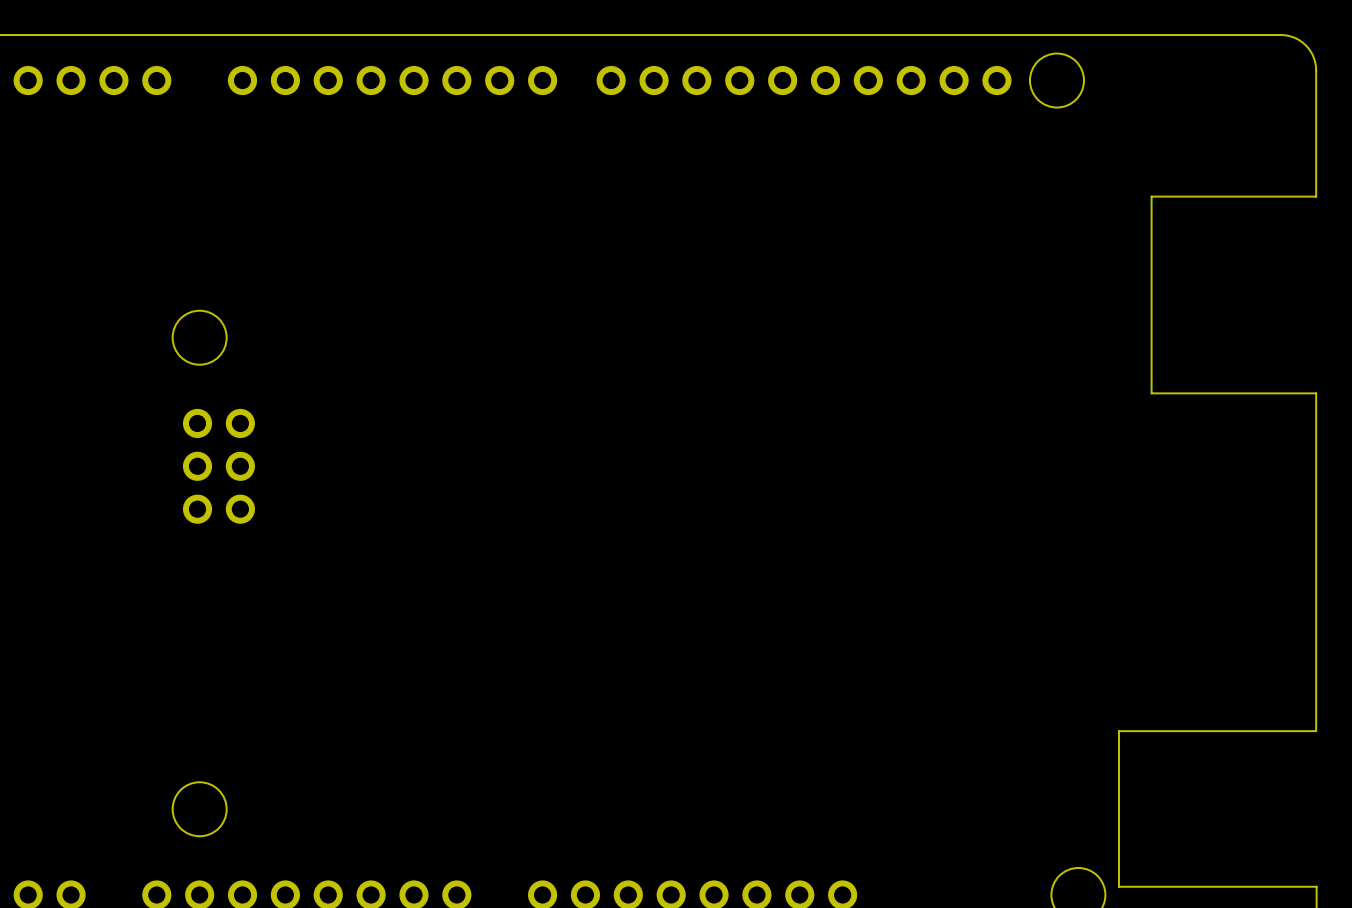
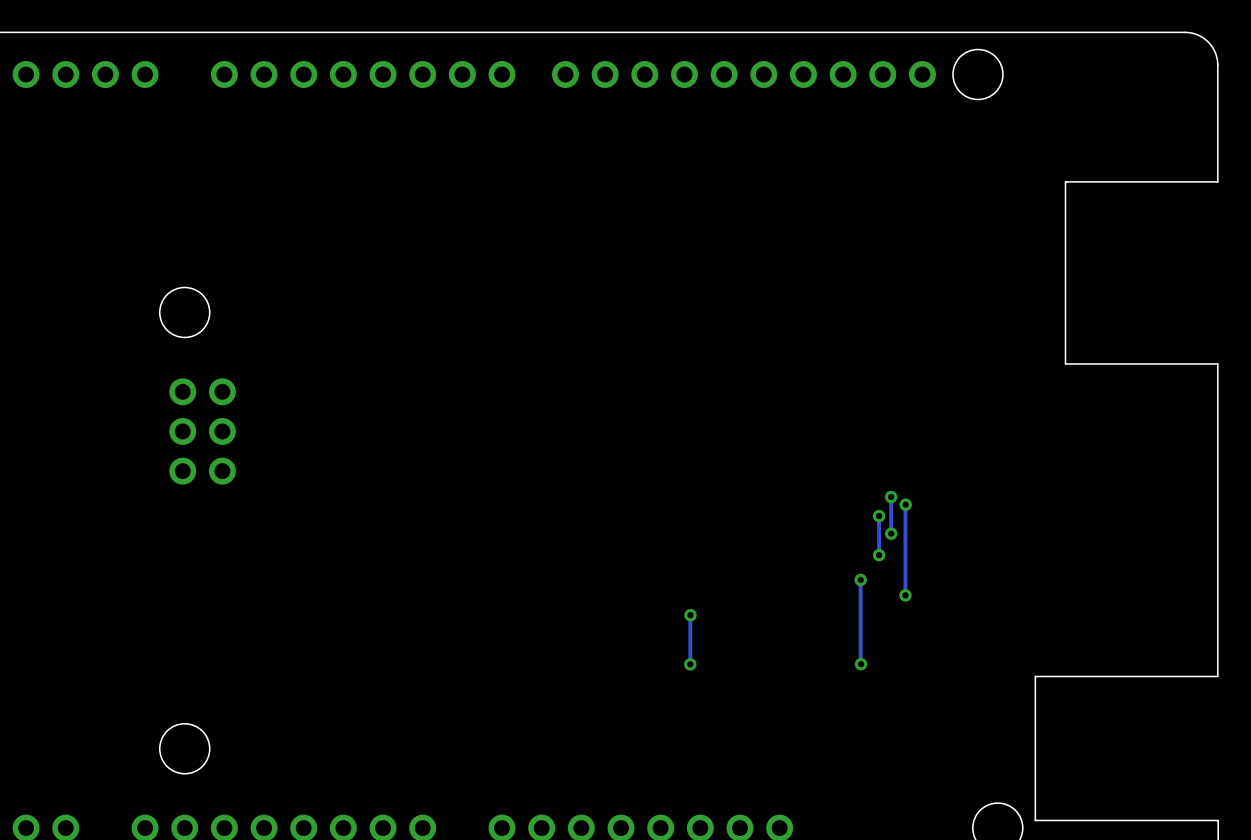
track: none -> (891, 497) (891, 533)
via: none -> (891, 497)
track: none -> (905, 504) (905, 595)
via: none -> (905, 504)
track: none -> (879, 516) (879, 555)
via: none -> (879, 516)
via: none -> (891, 533)
via: none -> (879, 555)
track: none -> (860, 579) (861, 664)
via: none -> (860, 579)
via: none -> (905, 595)
via: none -> (690, 615)
track: none -> (690, 615) (690, 664)
via: none -> (861, 664)
via: none -> (690, 664)

